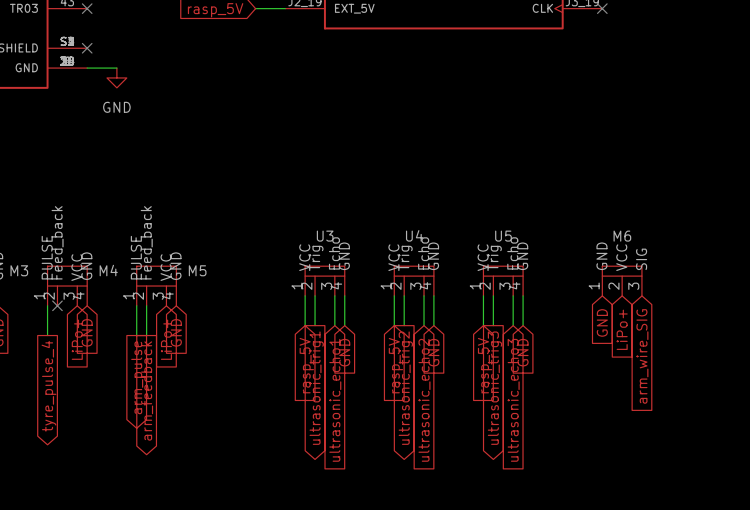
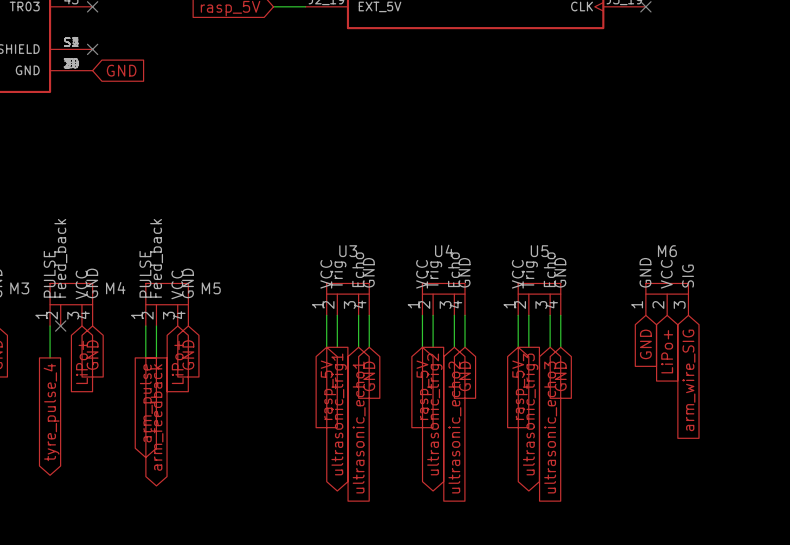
wire: (87, 68) (116, 68) -> none
global label: none -> GND (121, 70)
power symbol: GND (116, 77) -> none

